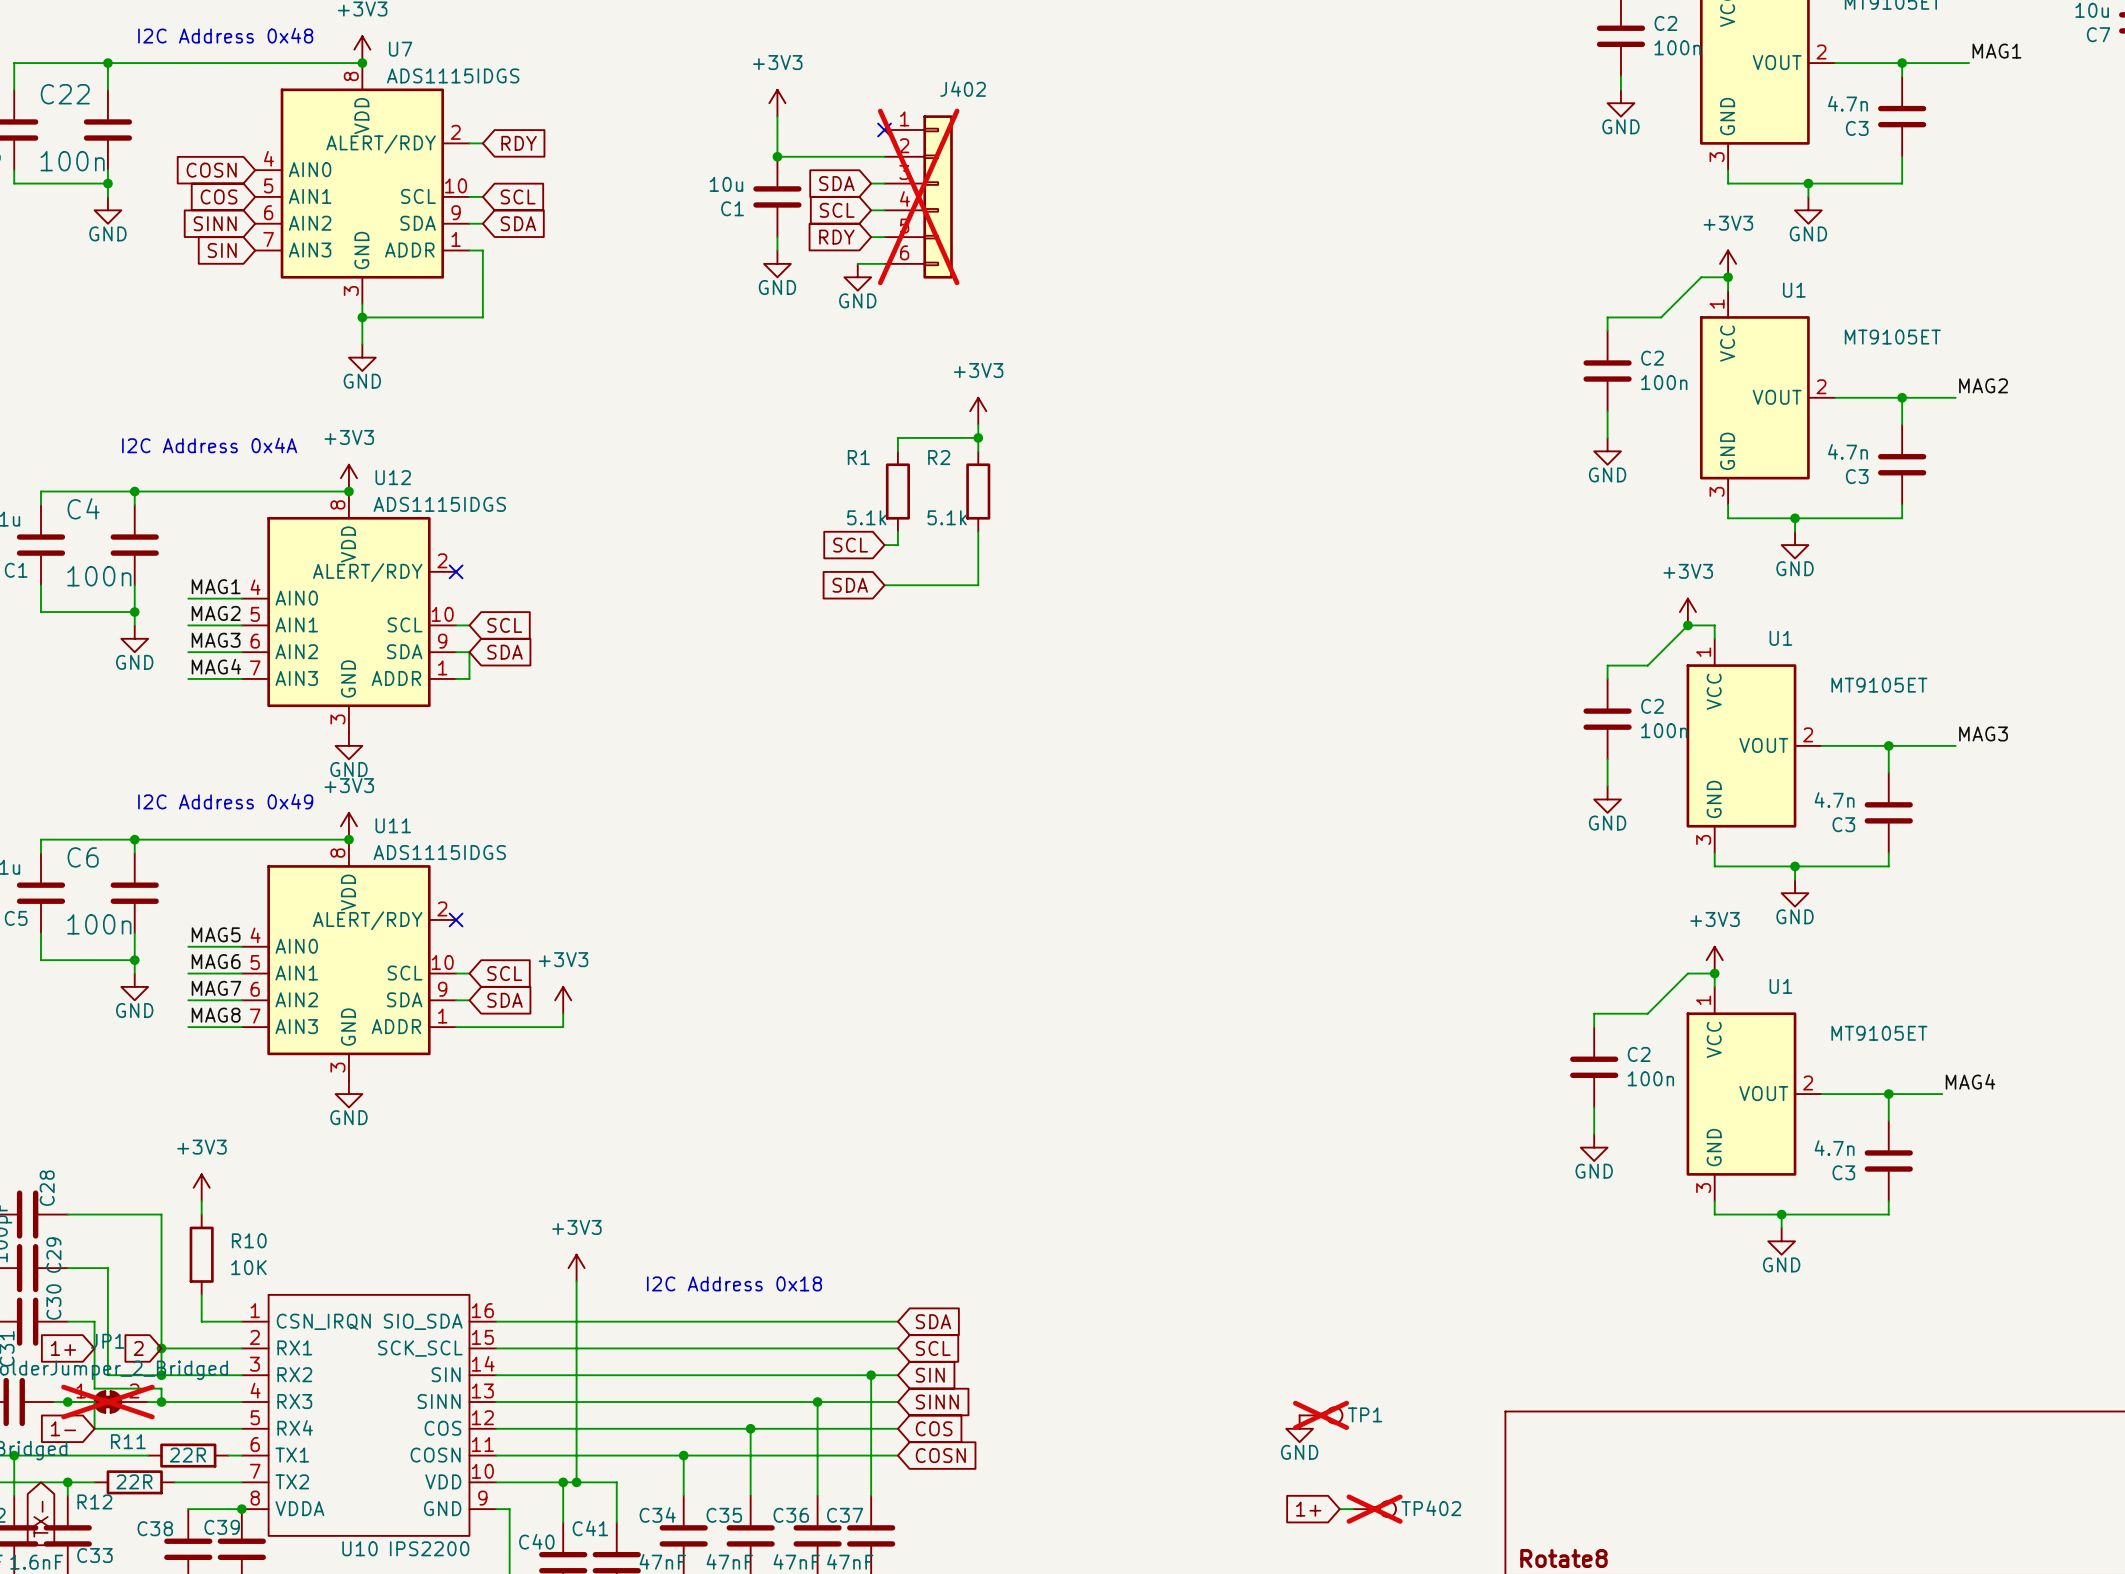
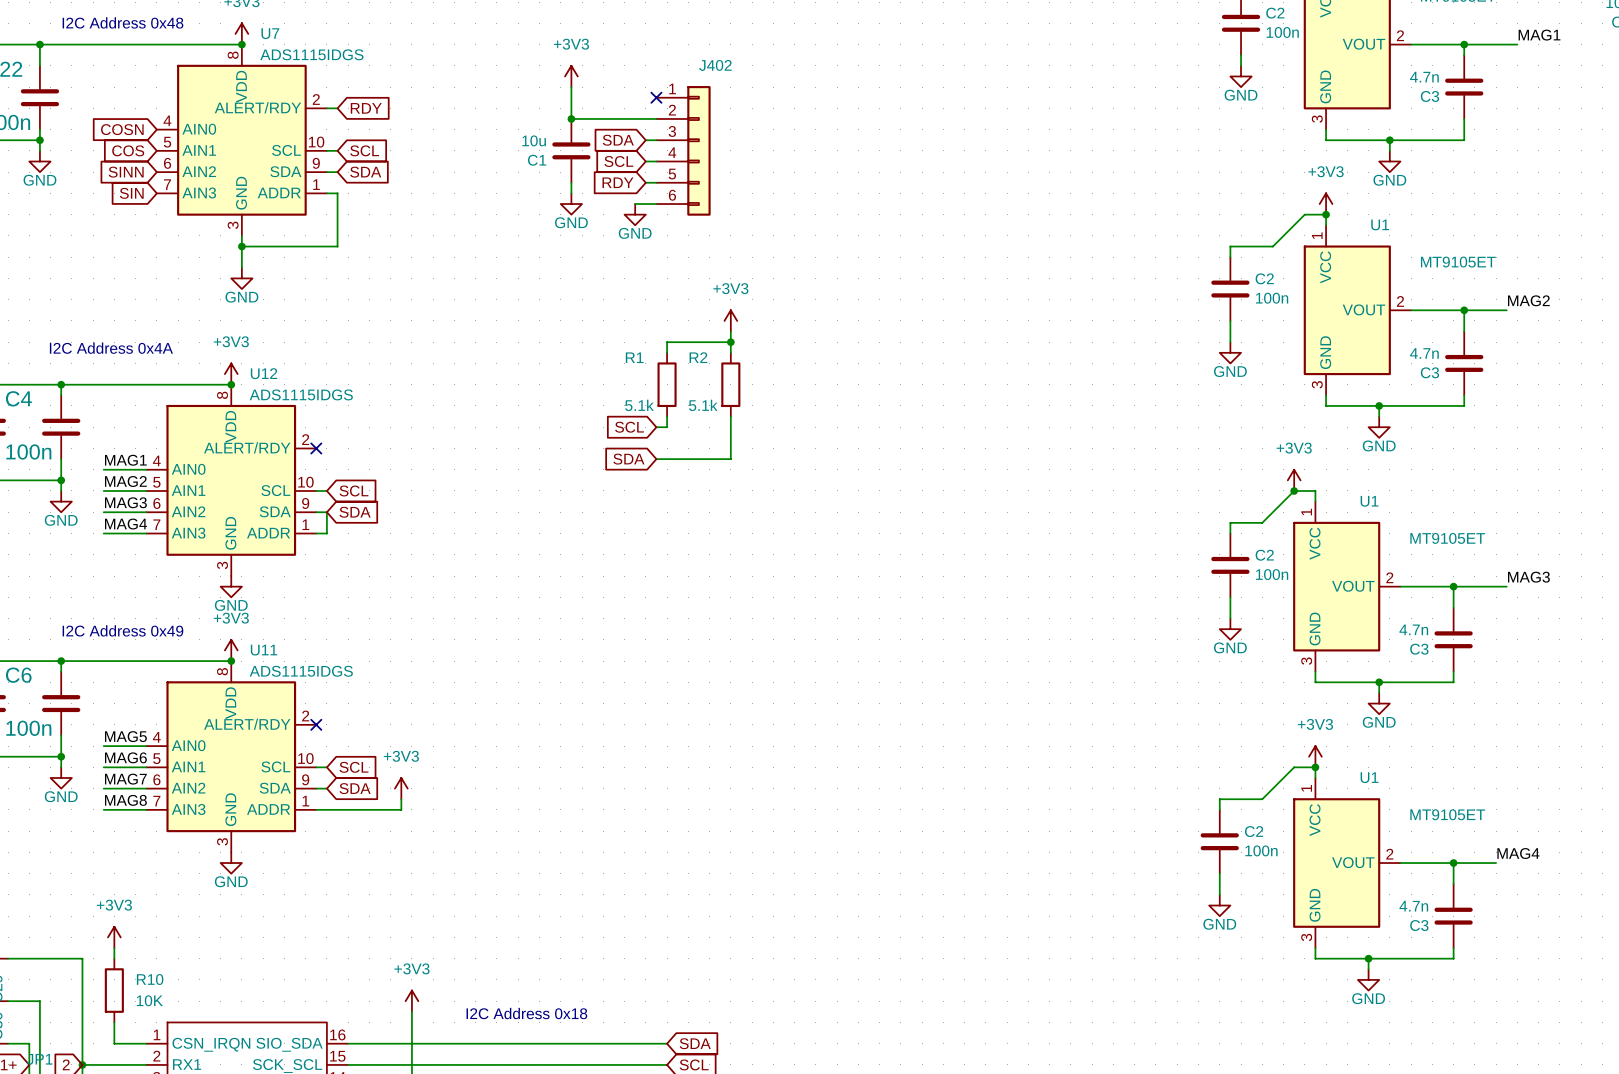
J402 do-not-place cross: (918, 196) -> none

